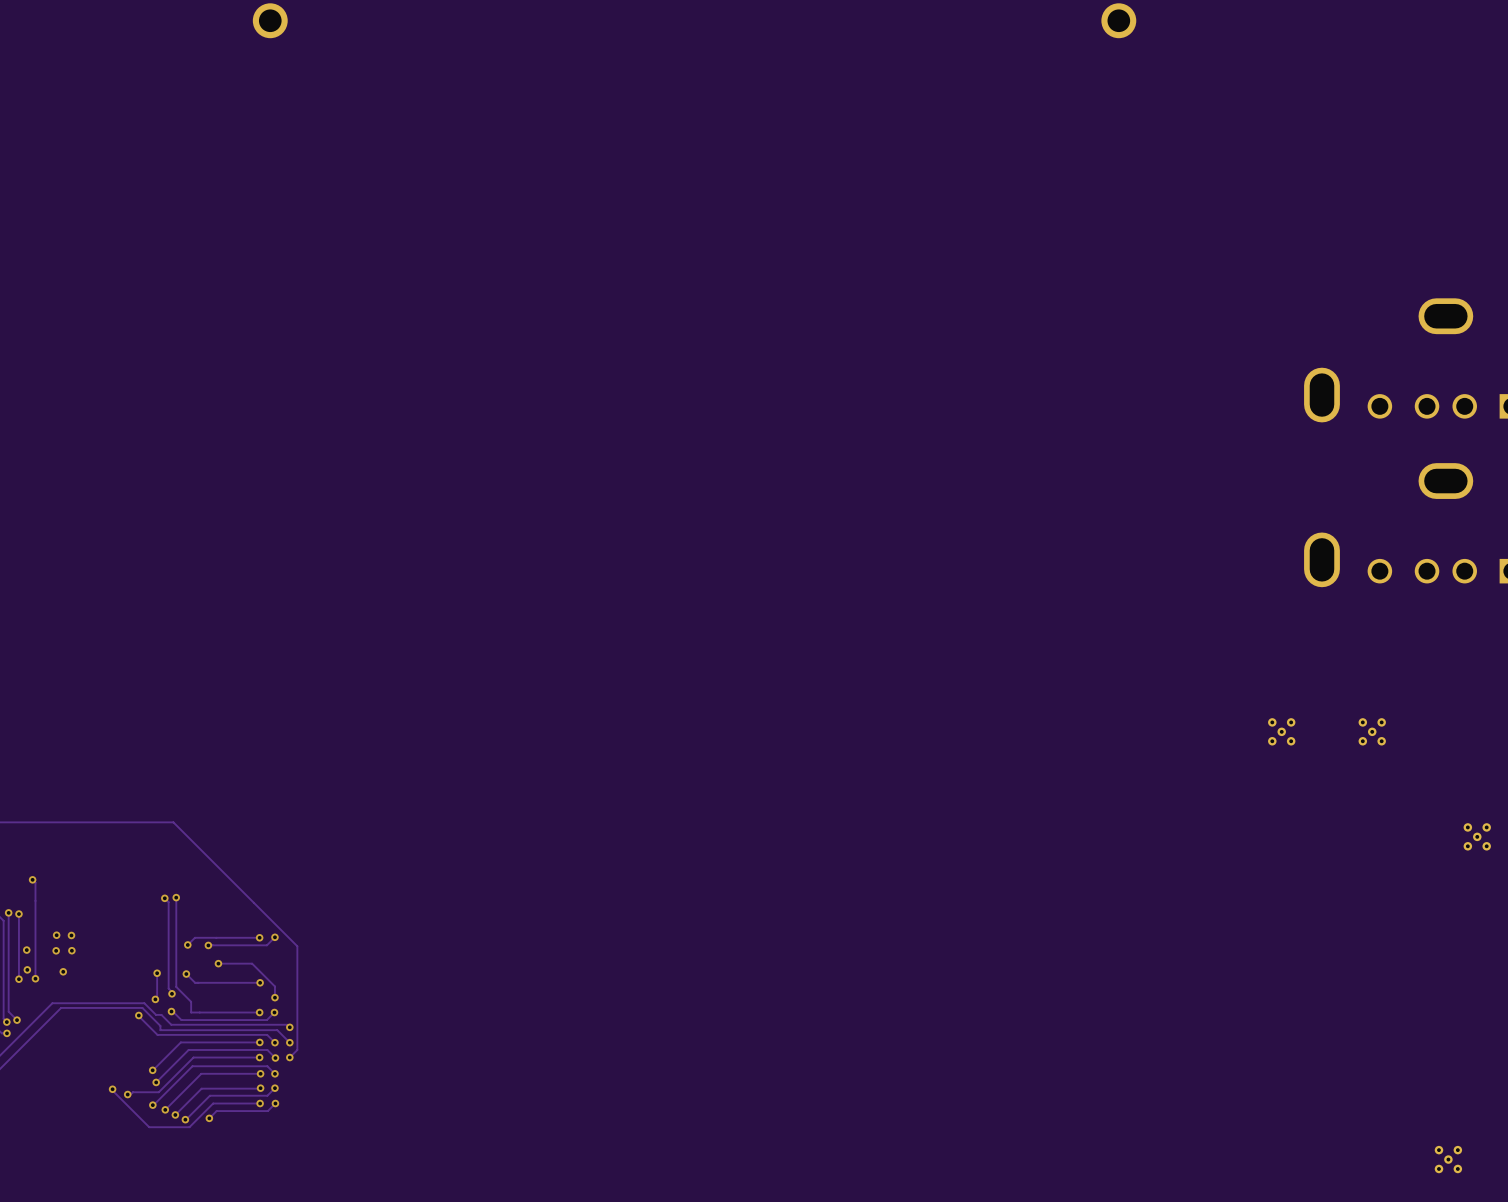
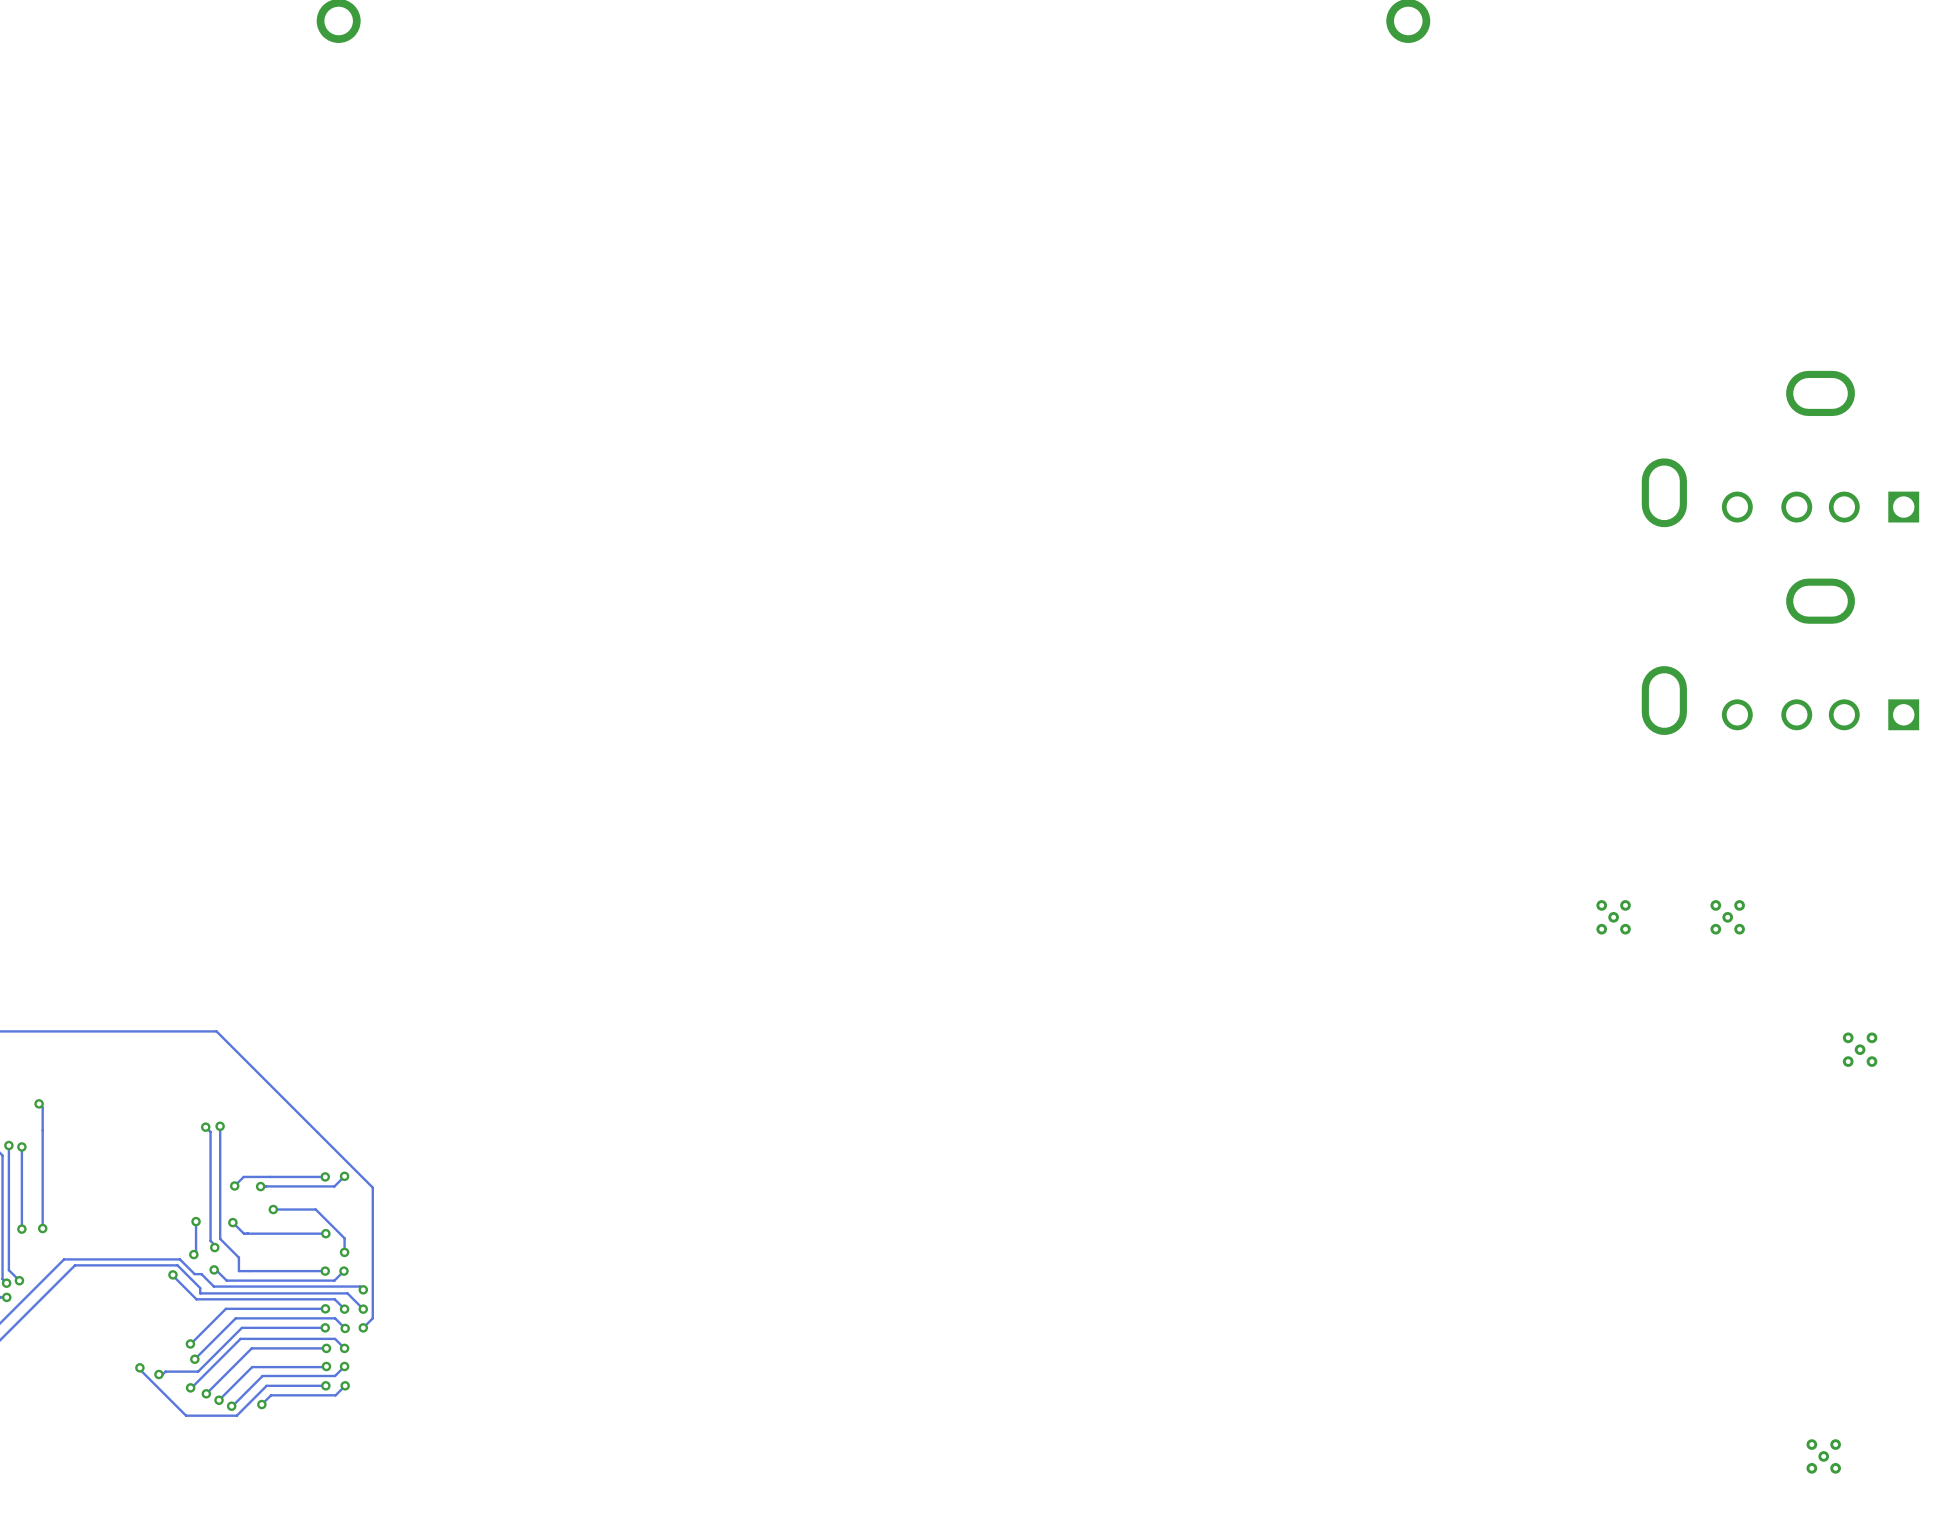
via: (56, 935) -> none
via: (71, 935) -> none
via: (26, 950) -> none
via: (56, 950) -> none
via: (71, 950) -> none
via: (27, 969) -> none
via: (63, 971) -> none

